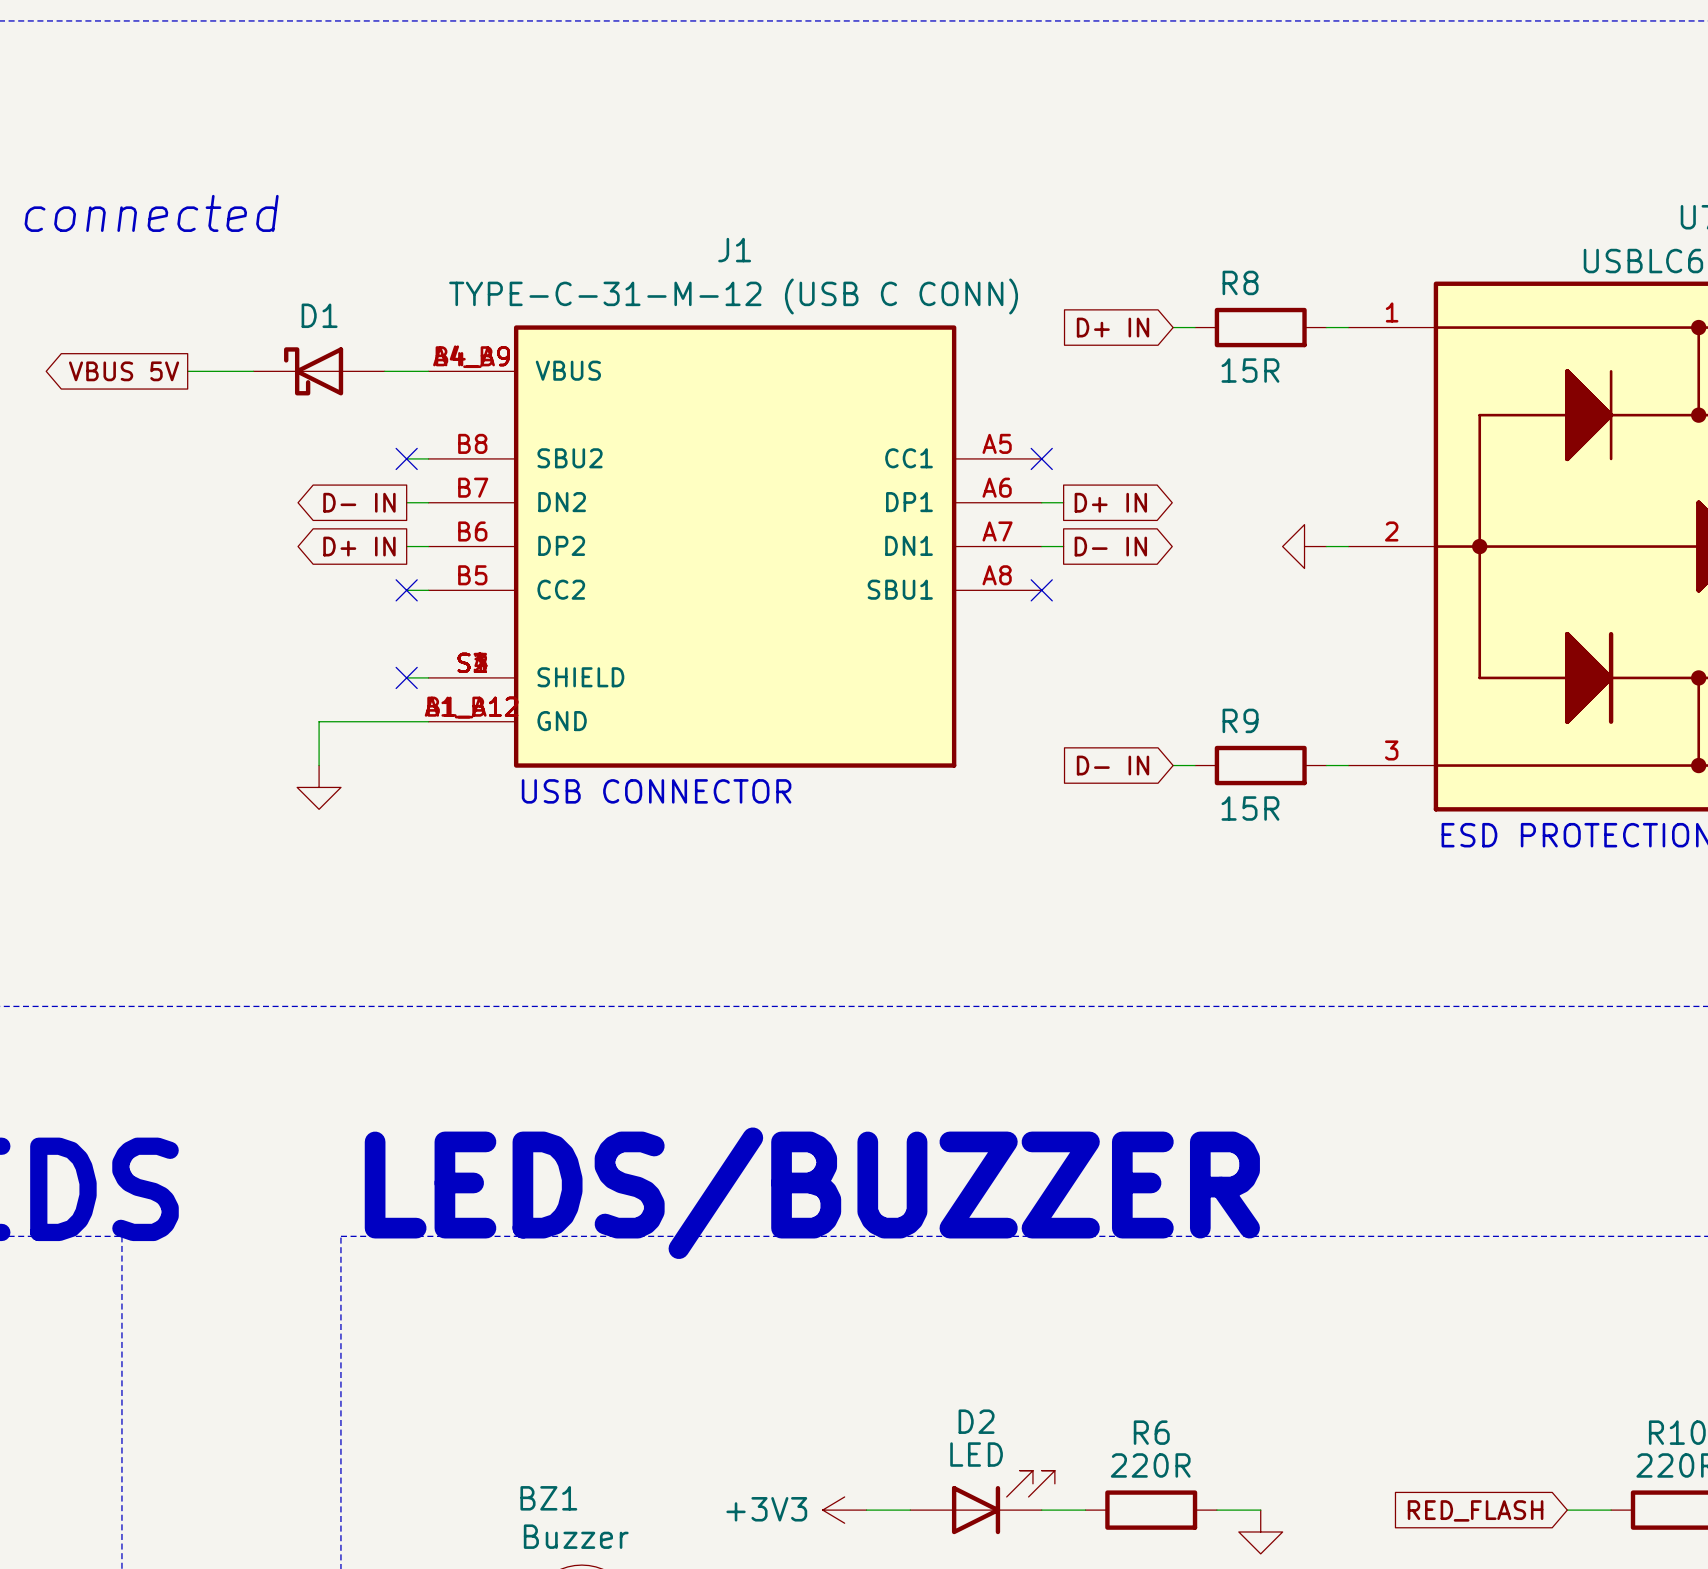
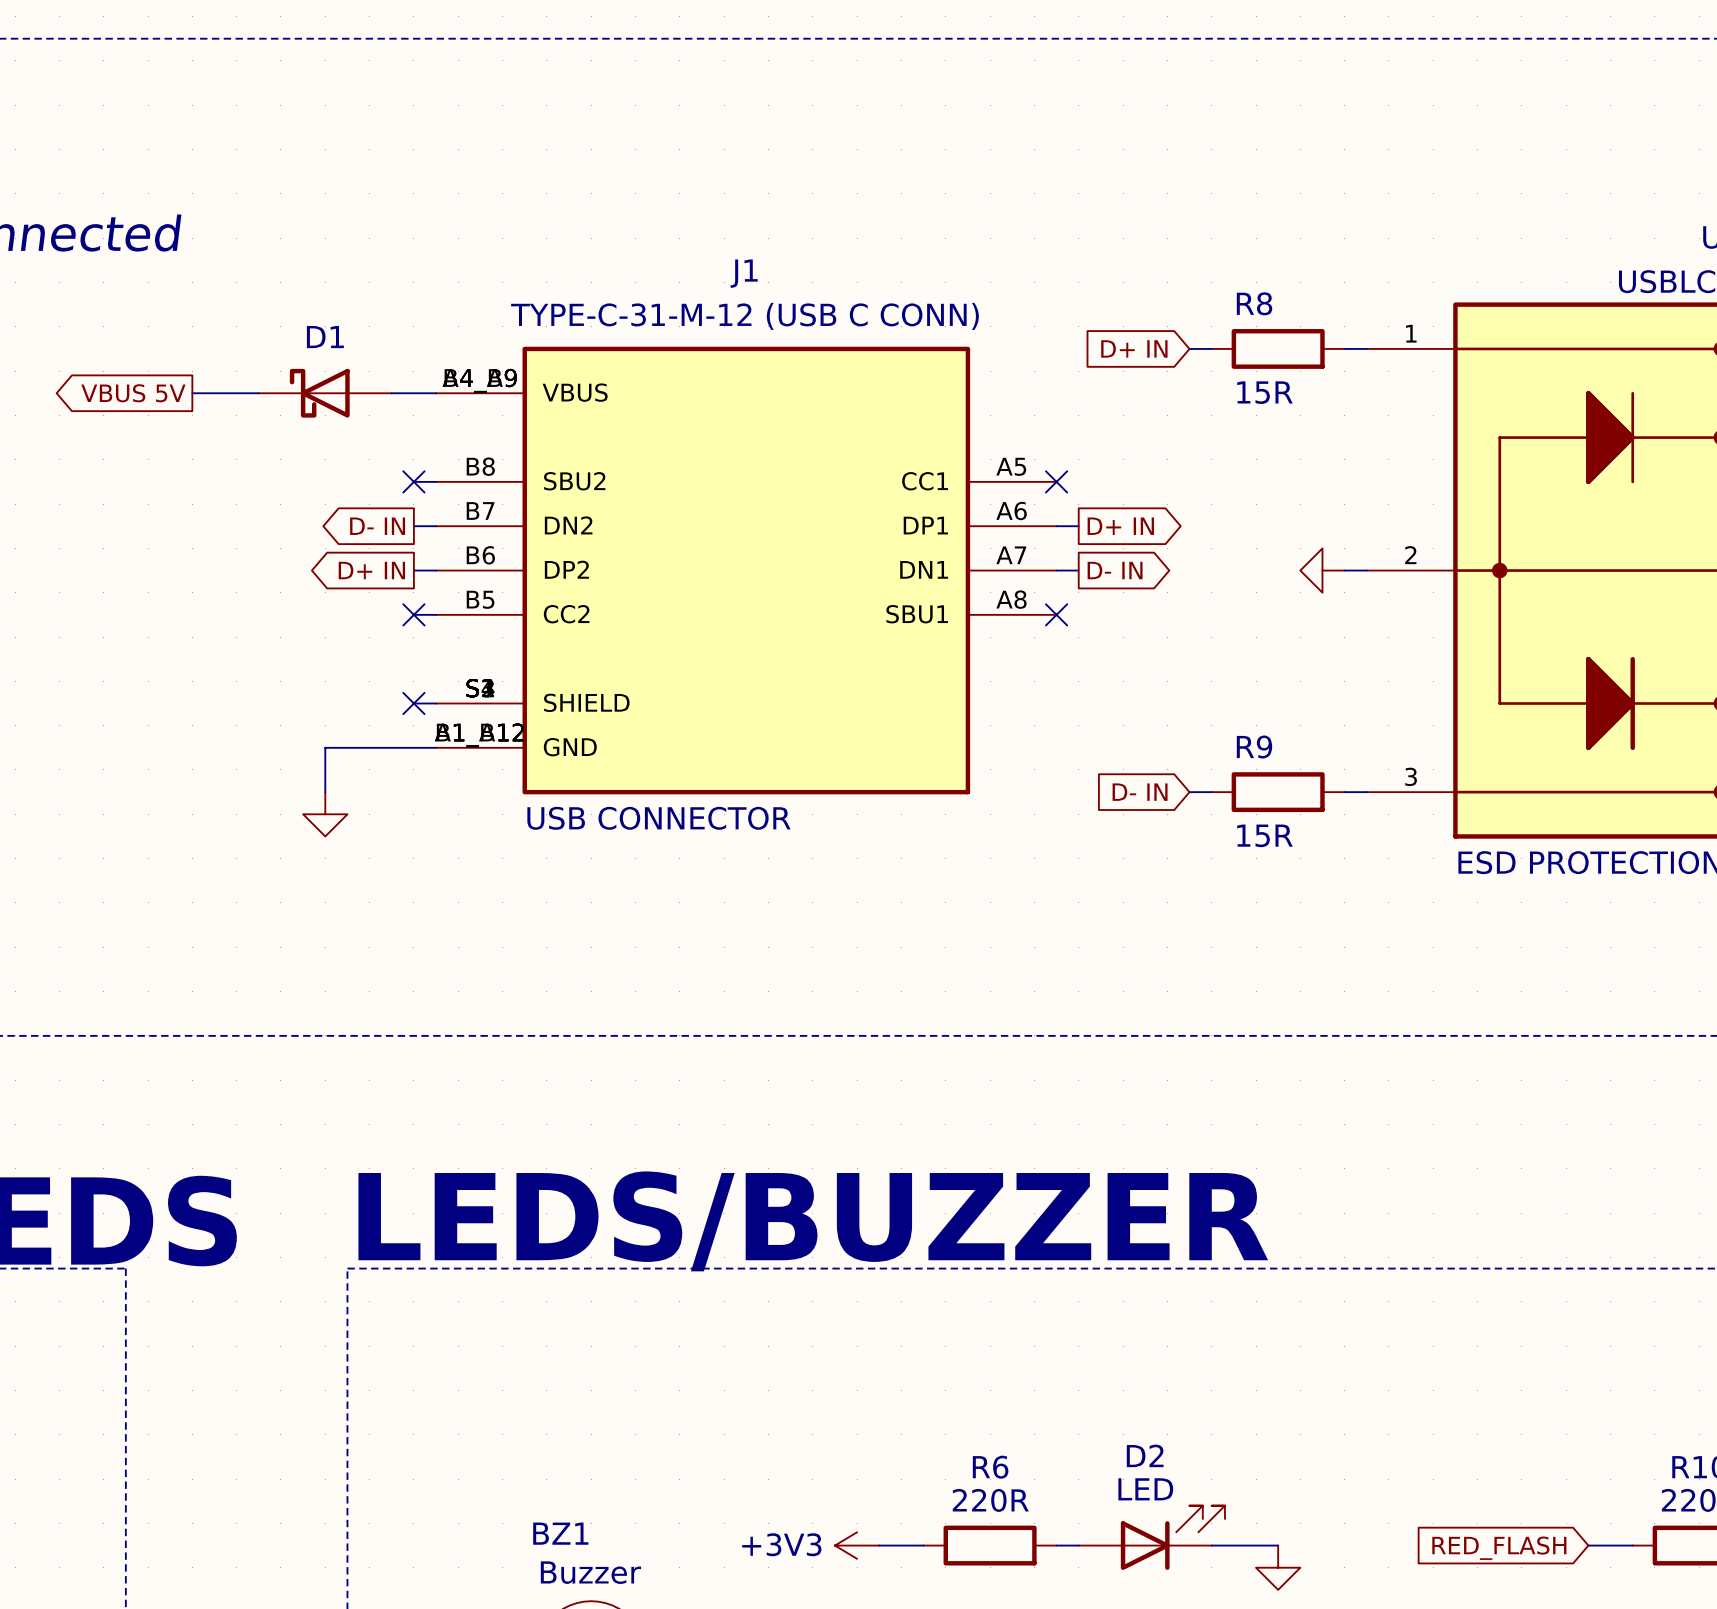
D2 position: (982, 1502) -> (1151, 1537)
R6 position: (1151, 1510) -> (990, 1545)

